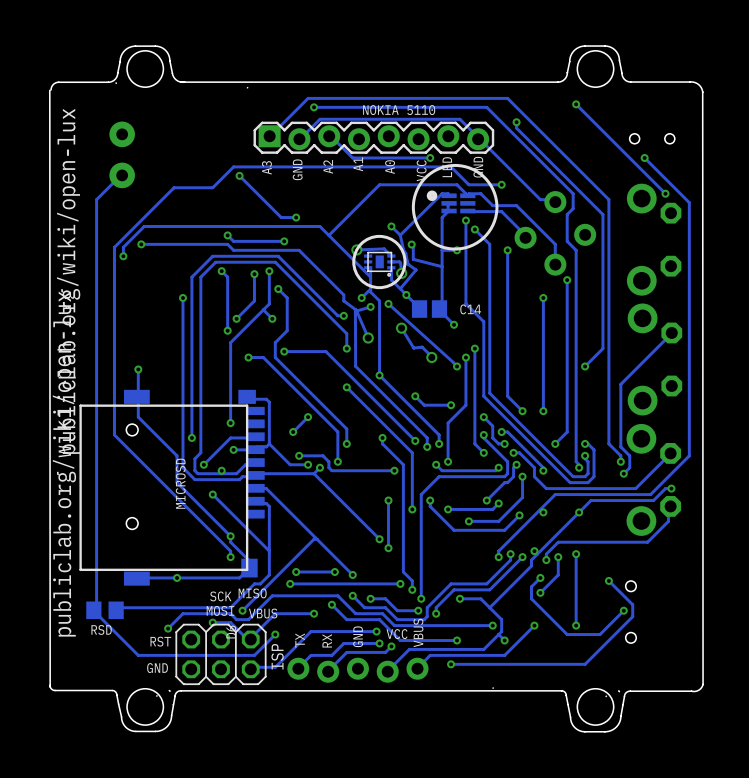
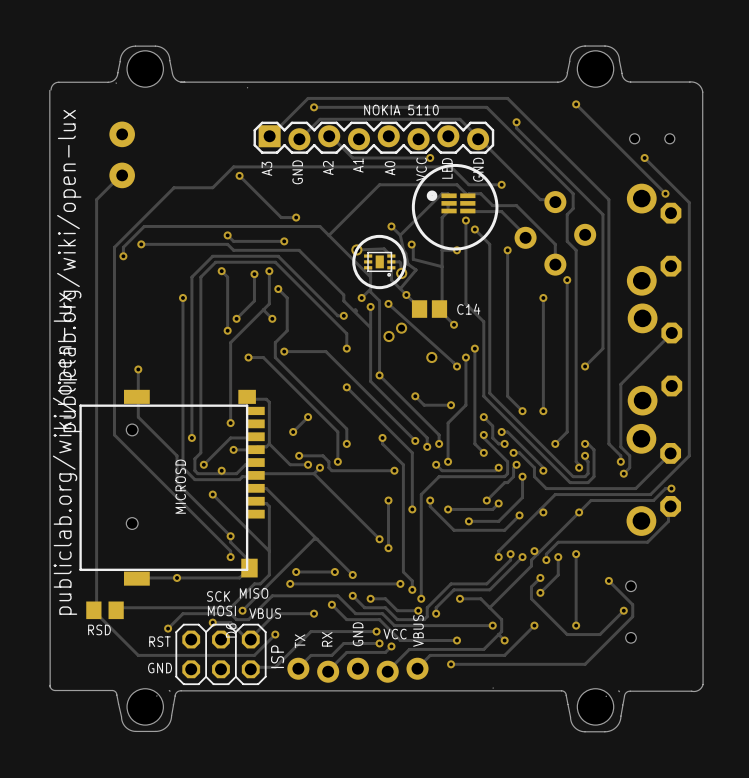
track: (343, 300) (355, 309) (355, 366) (370, 381) -> (370, 306) (370, 381)
track: none -> (343, 300) (370, 327)
track: (370, 306) (356, 311) (368, 338) -> none
track: (401, 328) (413, 348) (422, 347) (431, 357) -> none
via position: (368, 338) -> (389, 336)

